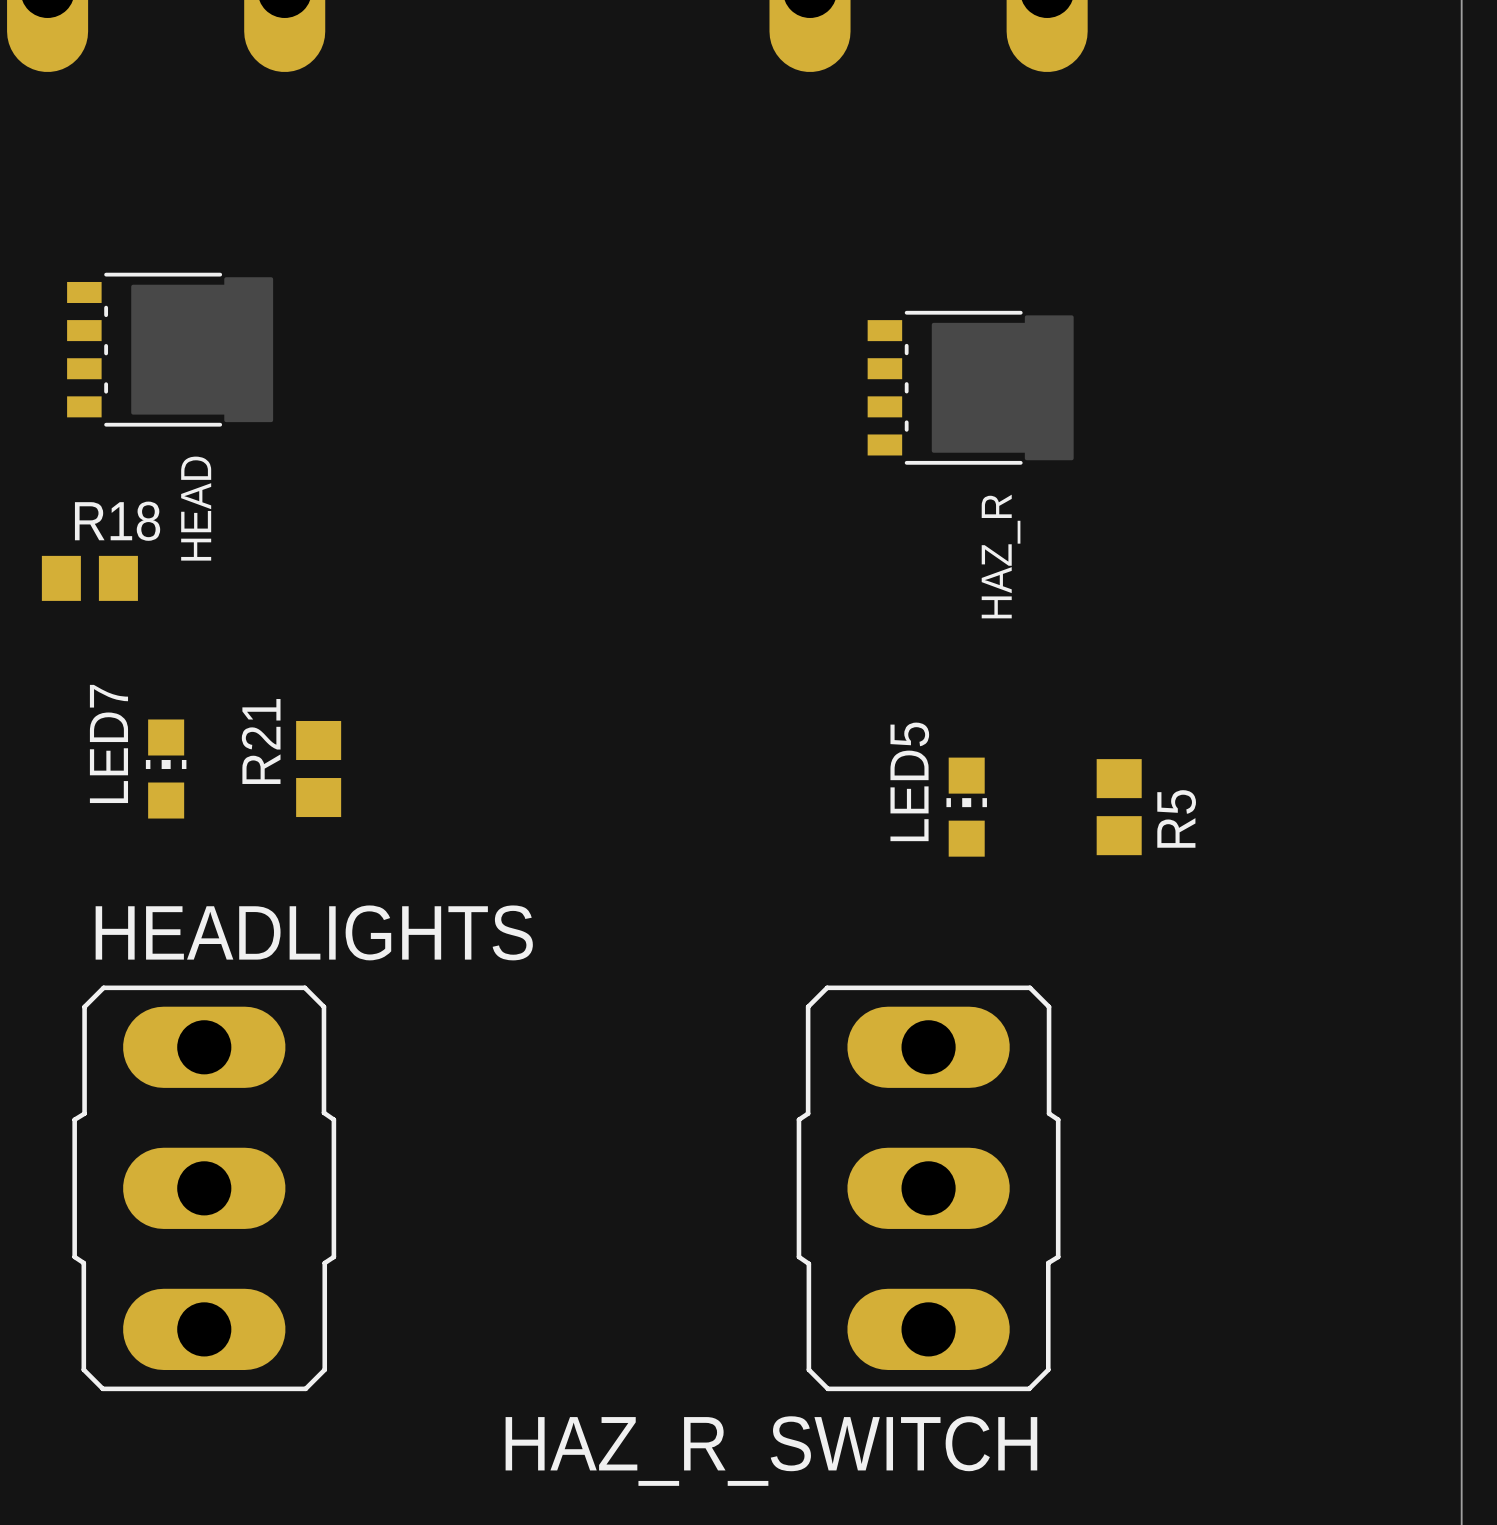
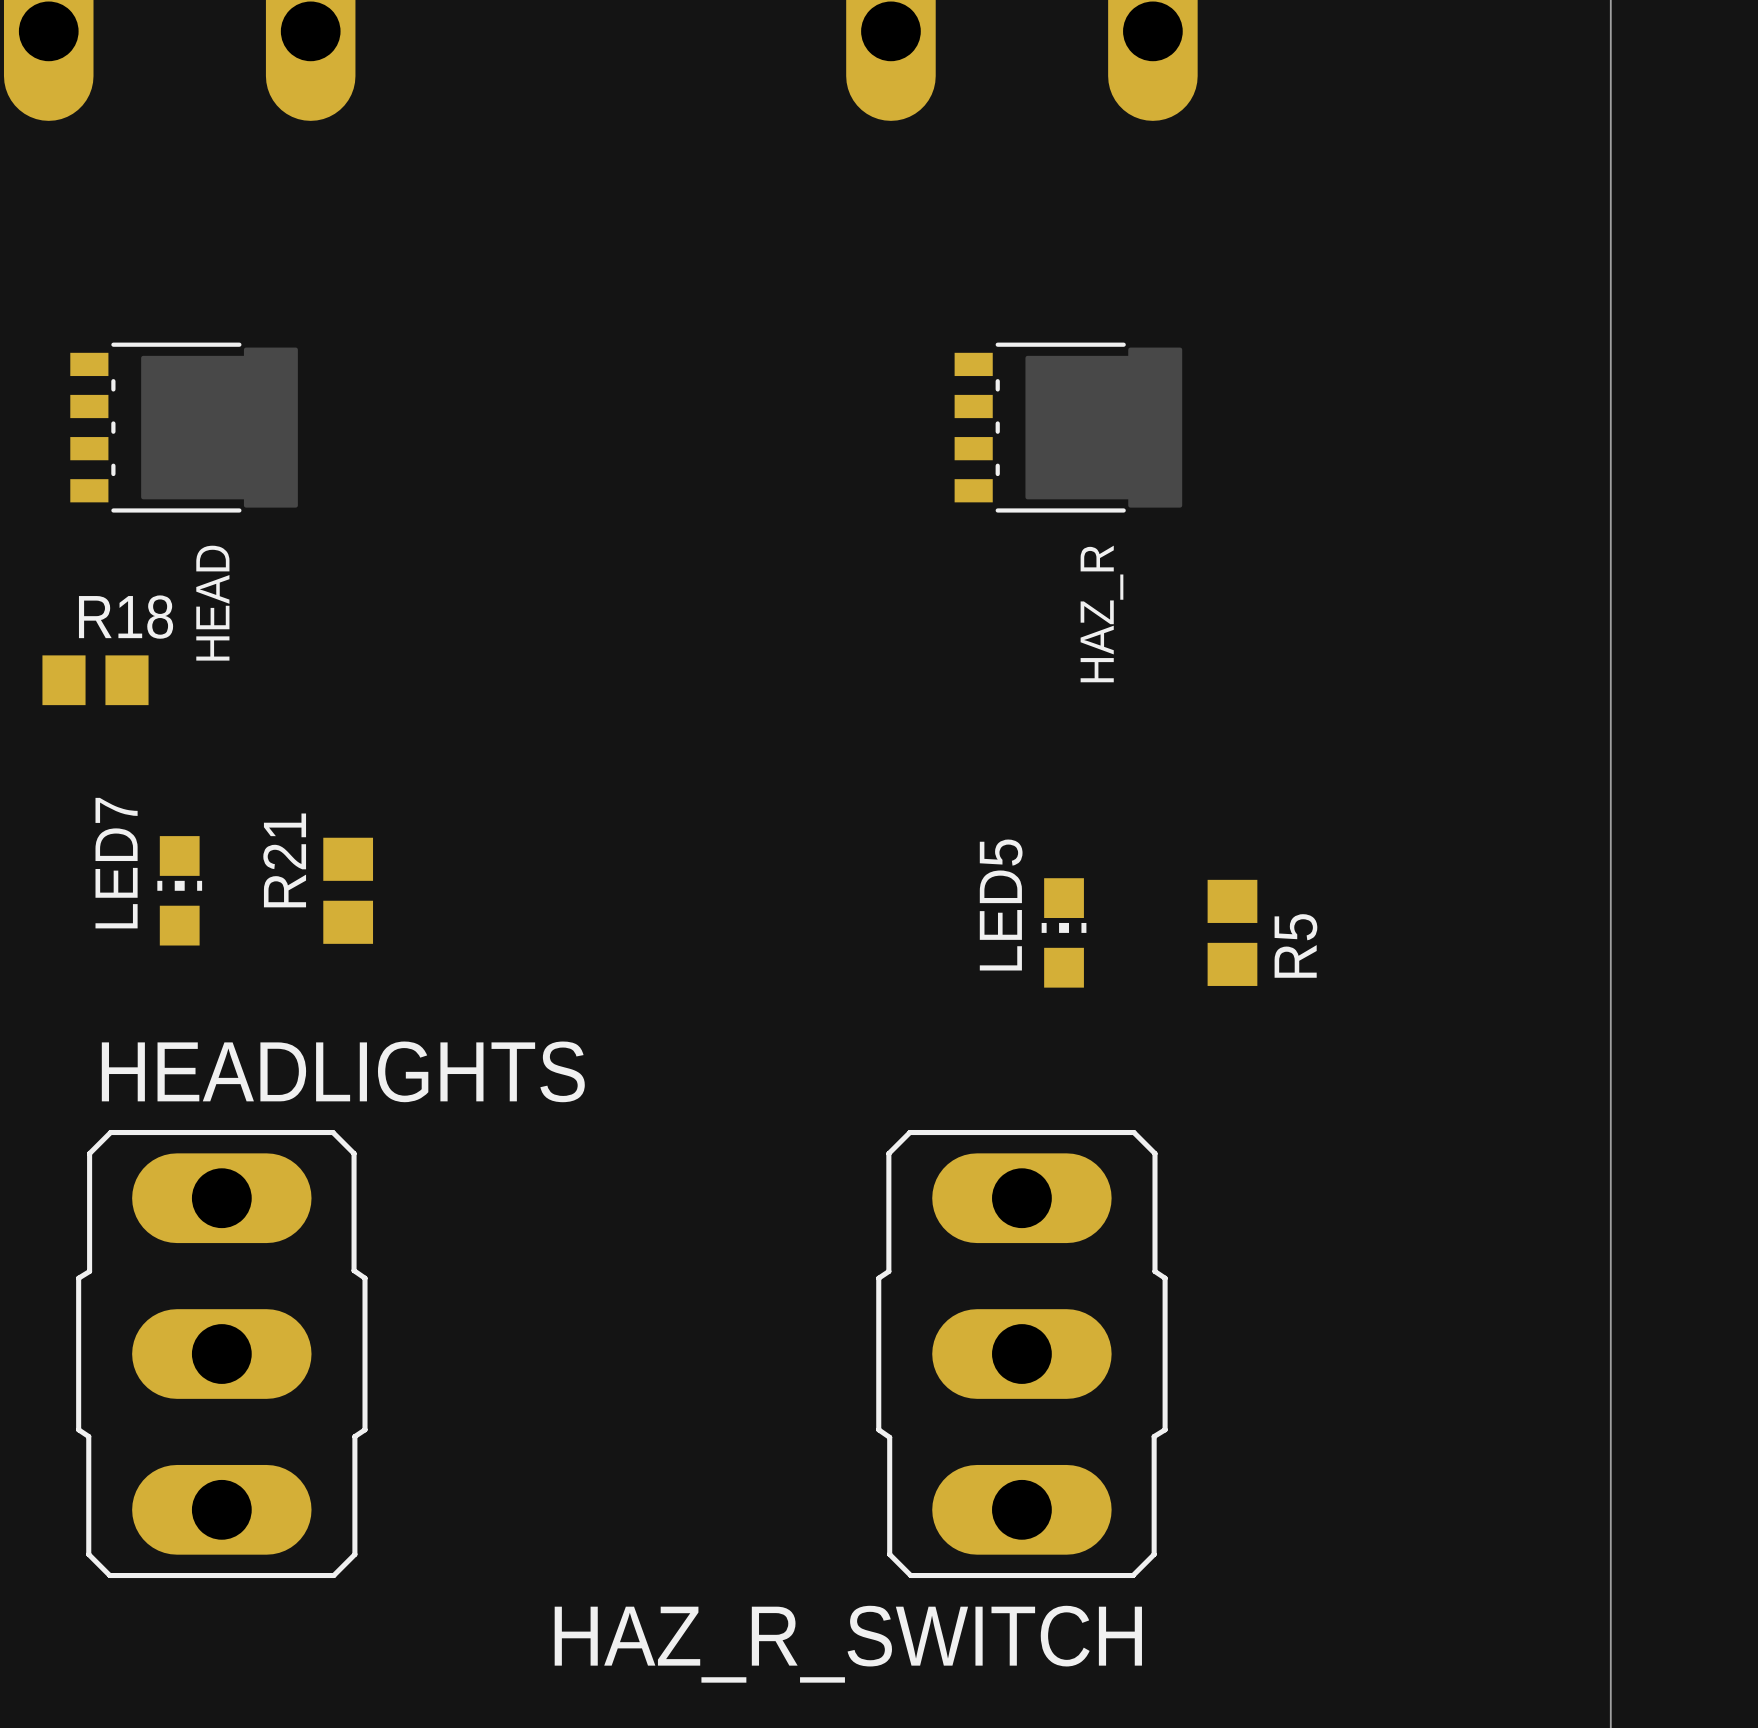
HAZ_R position: (970, 387) -> (1068, 427)

